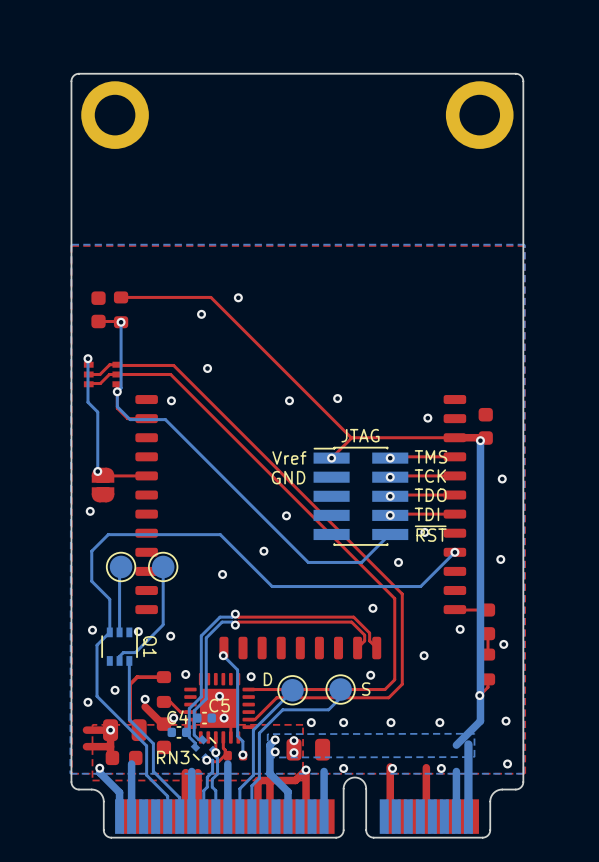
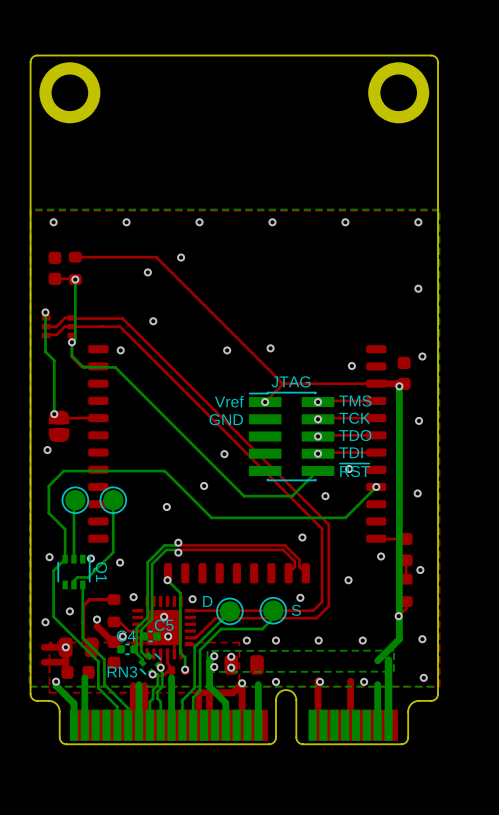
via: none -> (53, 222)
via: none -> (126, 222)
via: none -> (199, 222)
via: none -> (272, 222)
via: none -> (345, 222)
via: none -> (418, 222)
via: none -> (418, 288)
via: none -> (422, 356)

